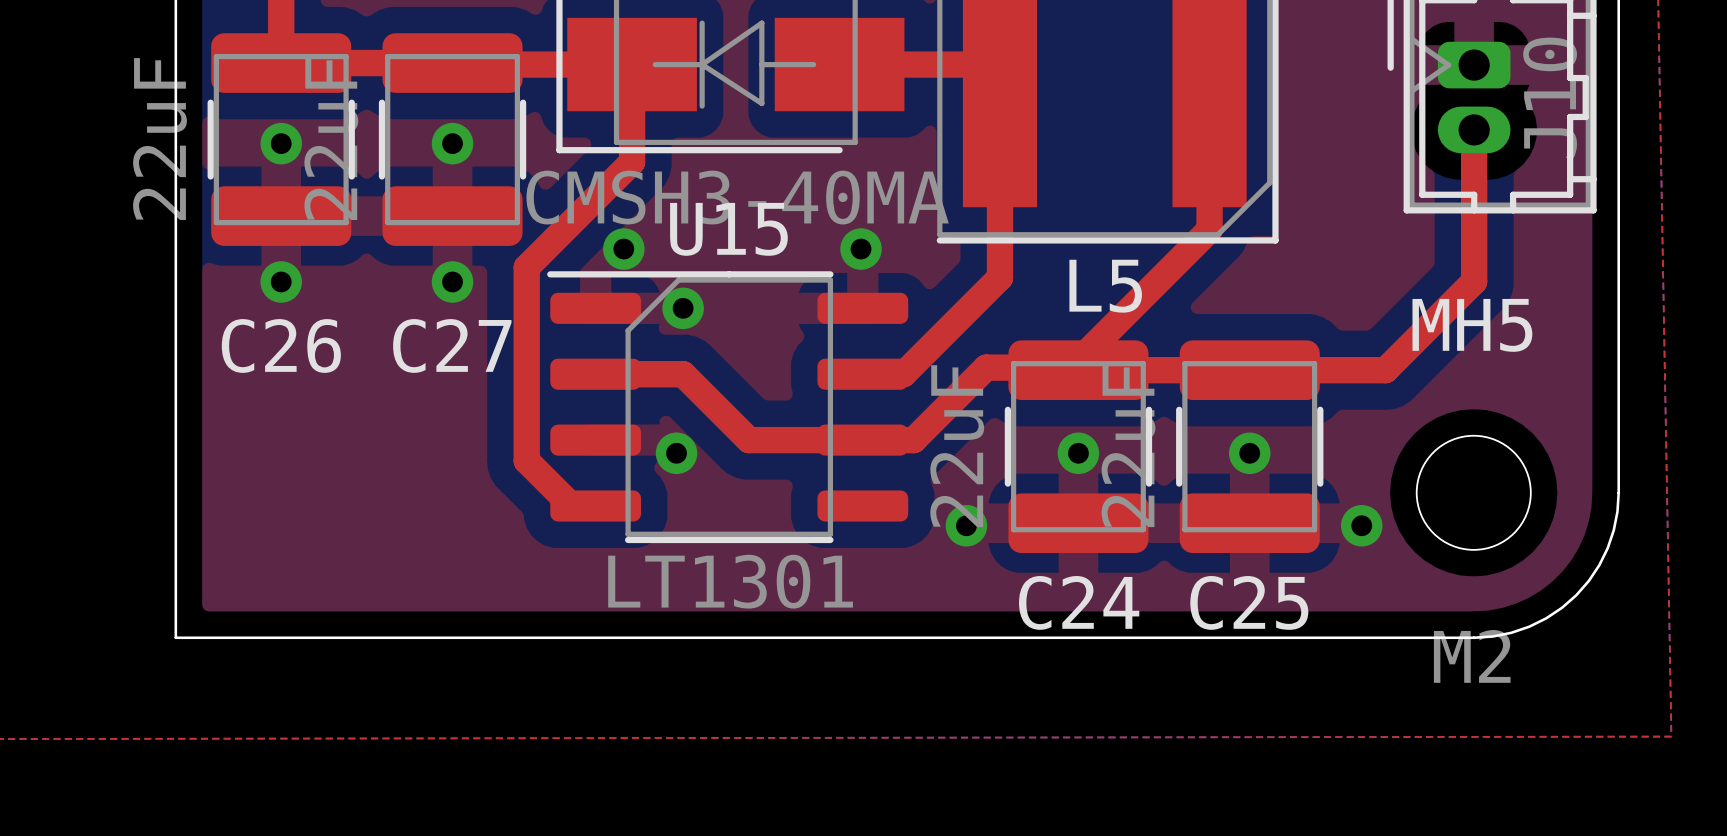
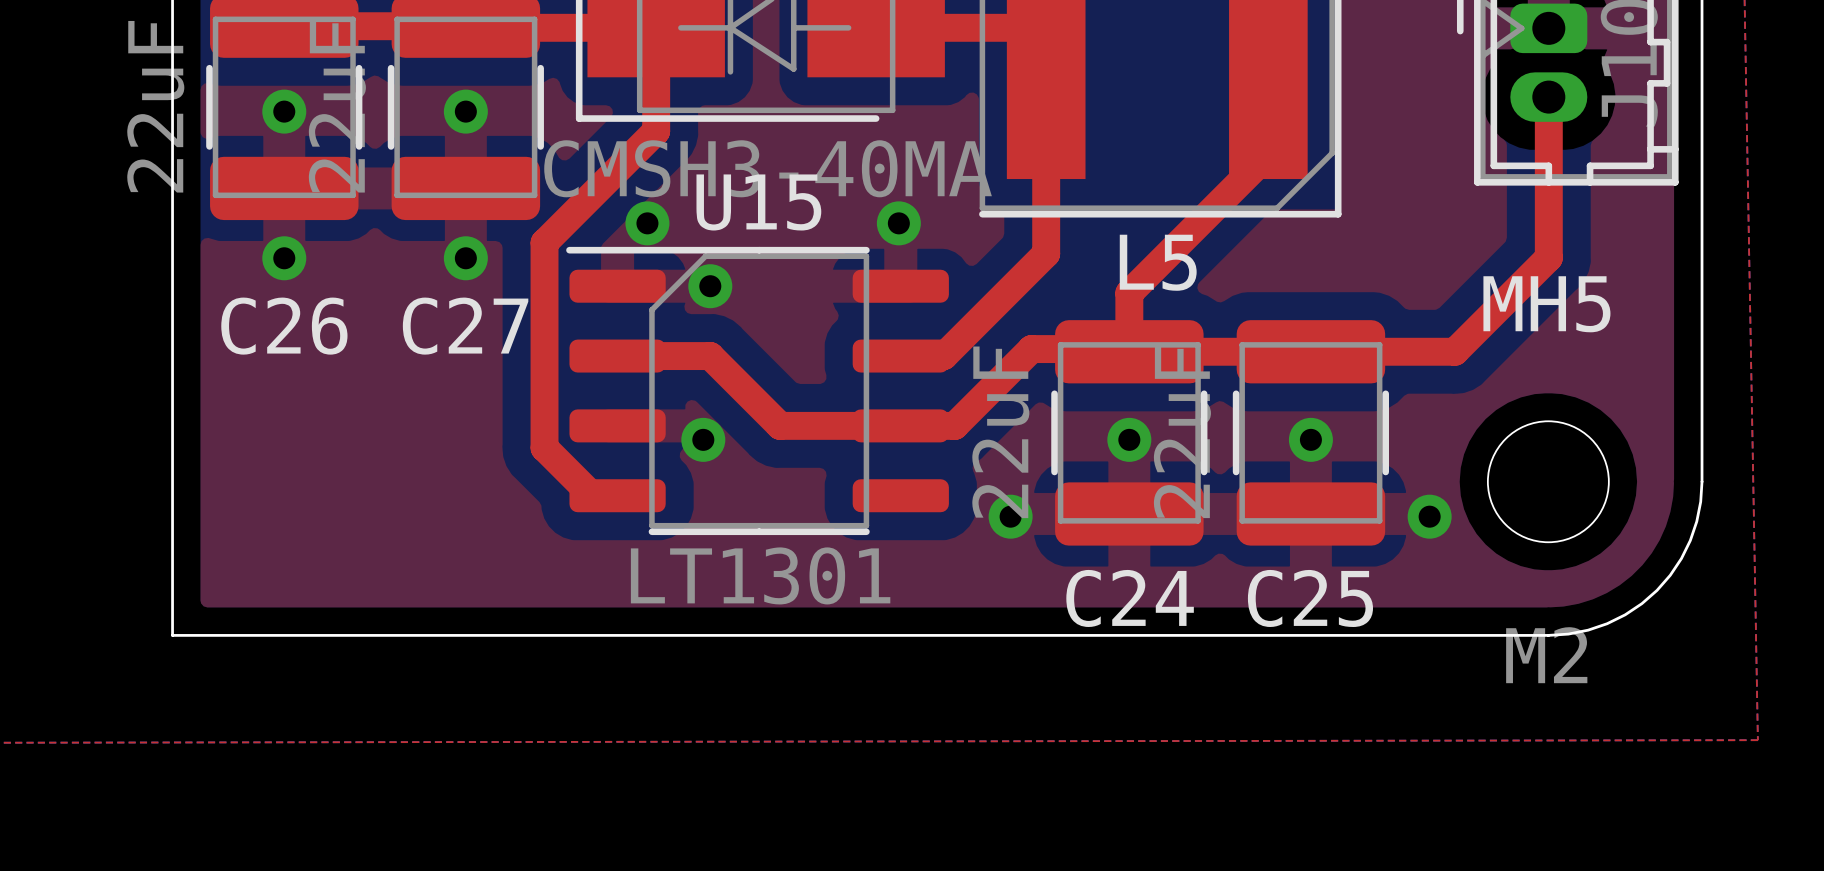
top track: (1209, 183) (1209, 229) (1078, 361) -> (1268, 154) (1129, 293) (1129, 342)

